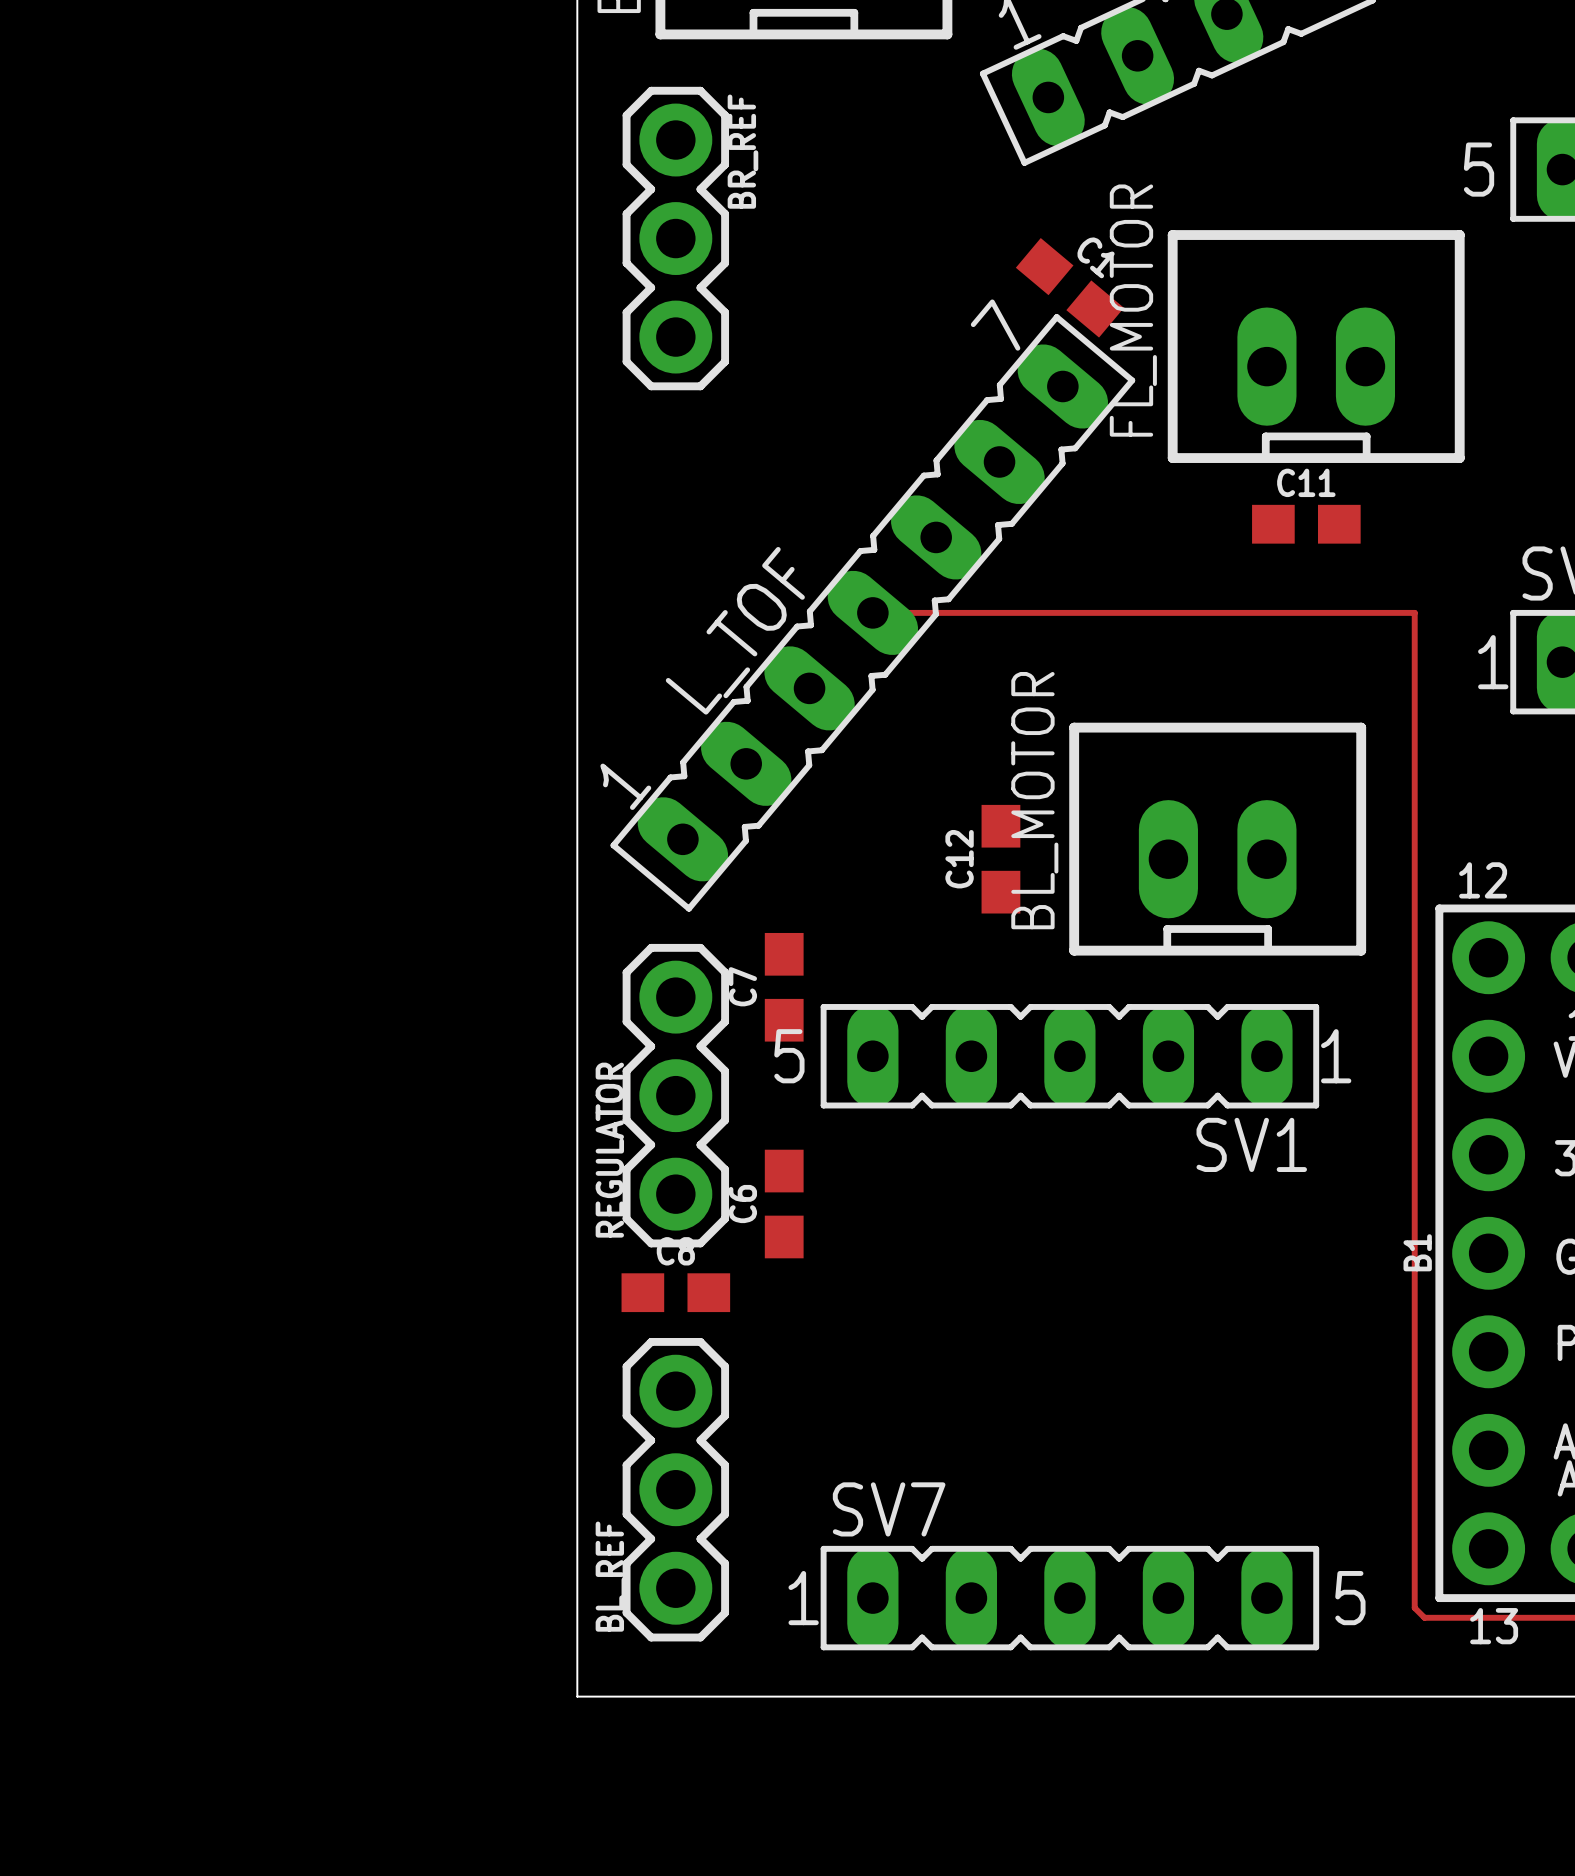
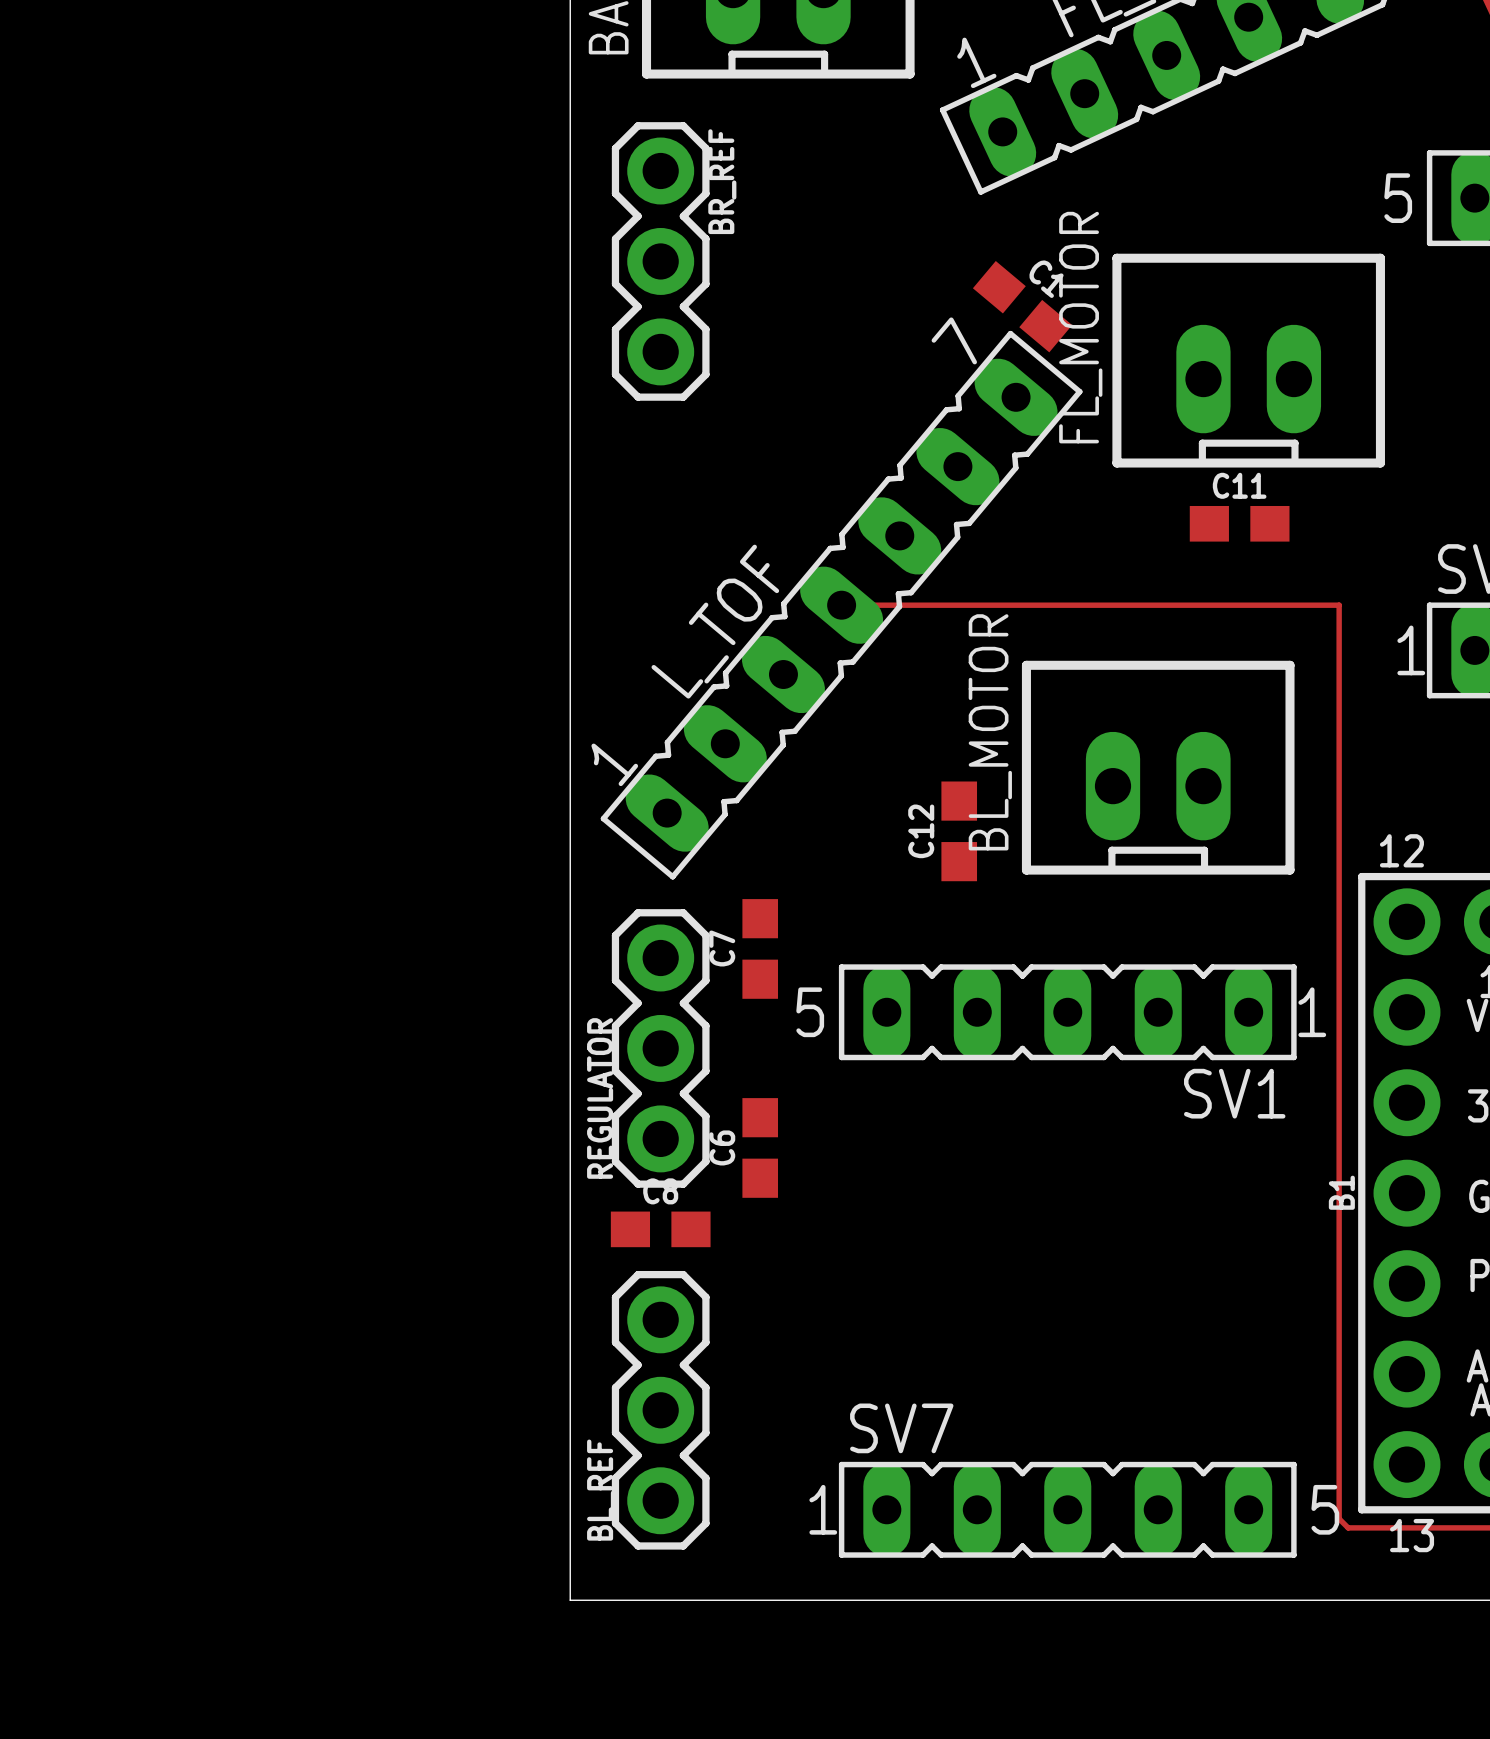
BL_MOTOR position: (1217, 839) -> (1158, 767)
SV1 position: (1069, 1056) -> (1067, 1012)
SV7 position: (1069, 1598) -> (1067, 1509)

